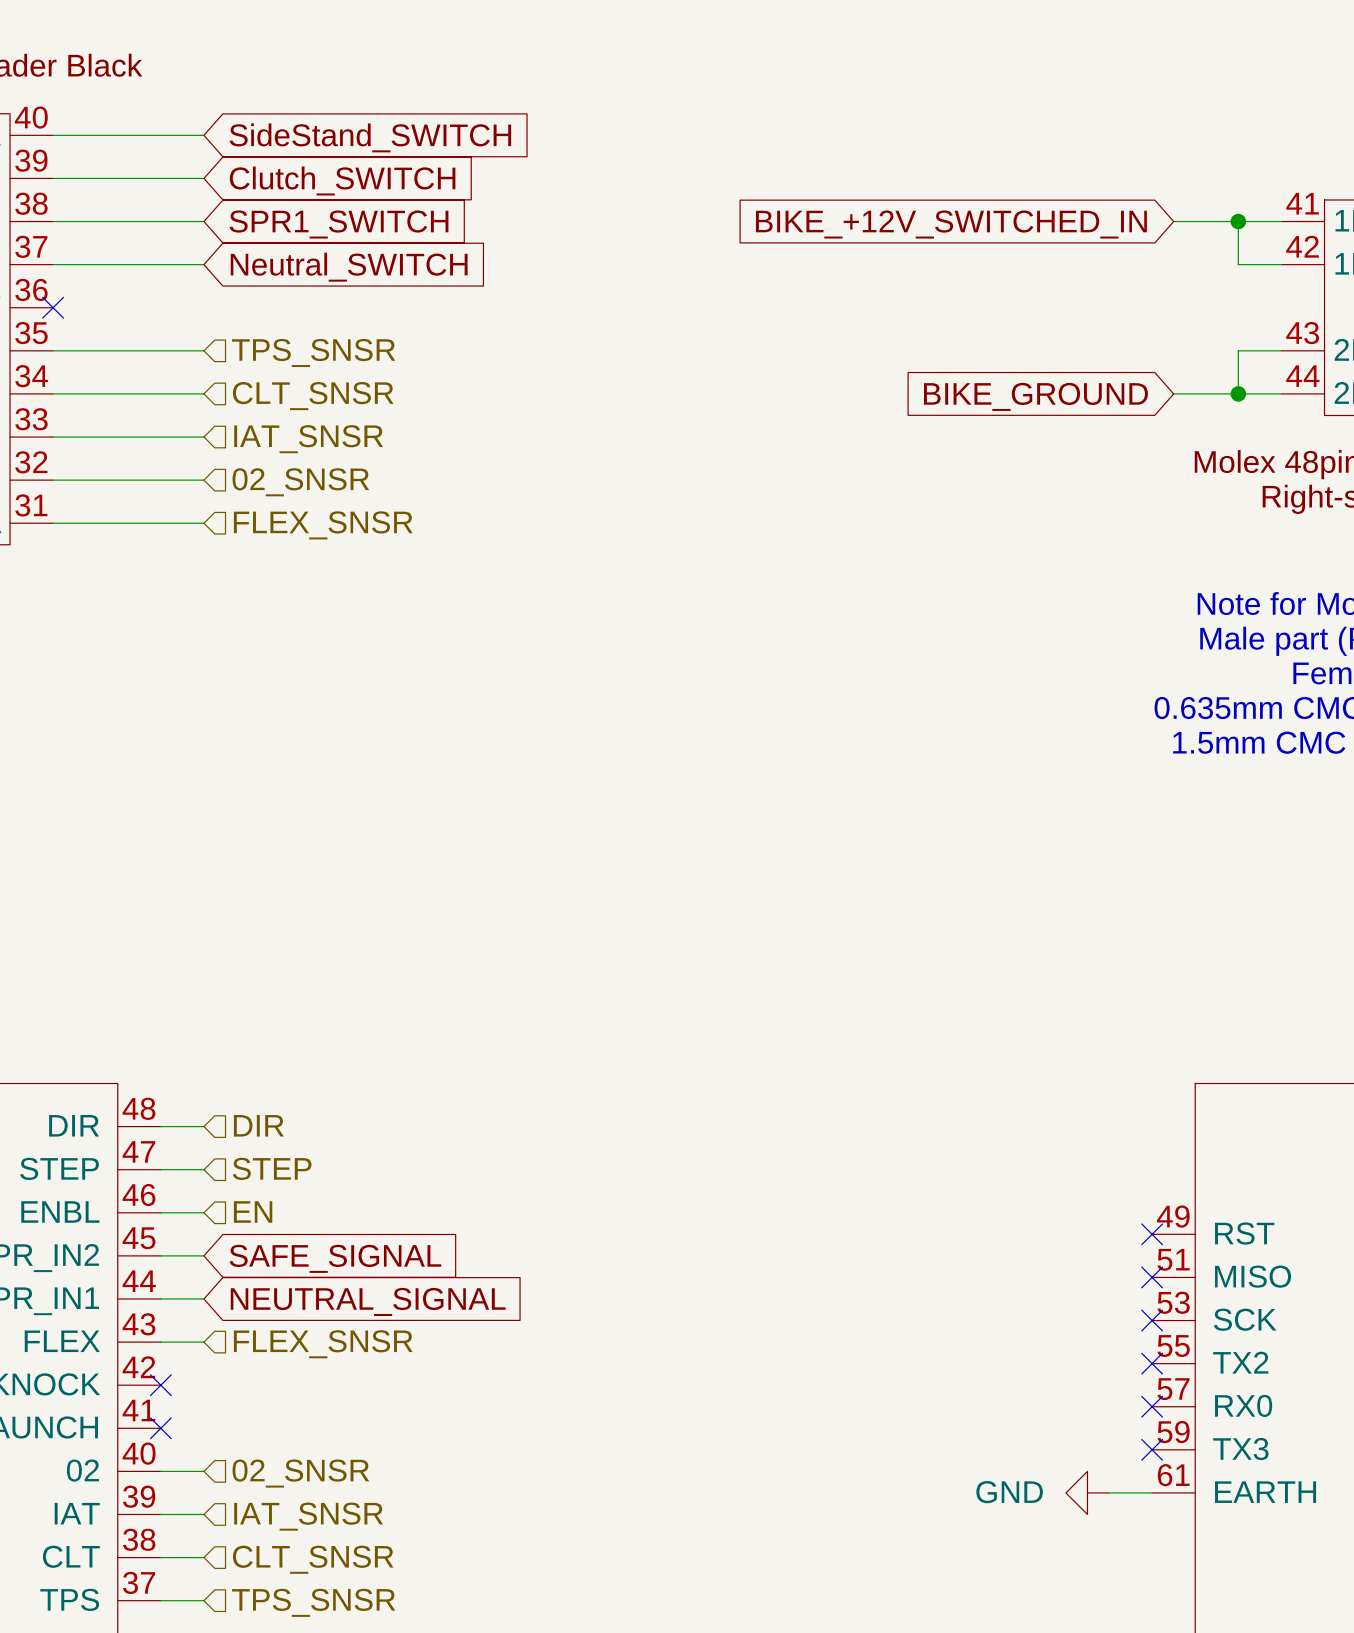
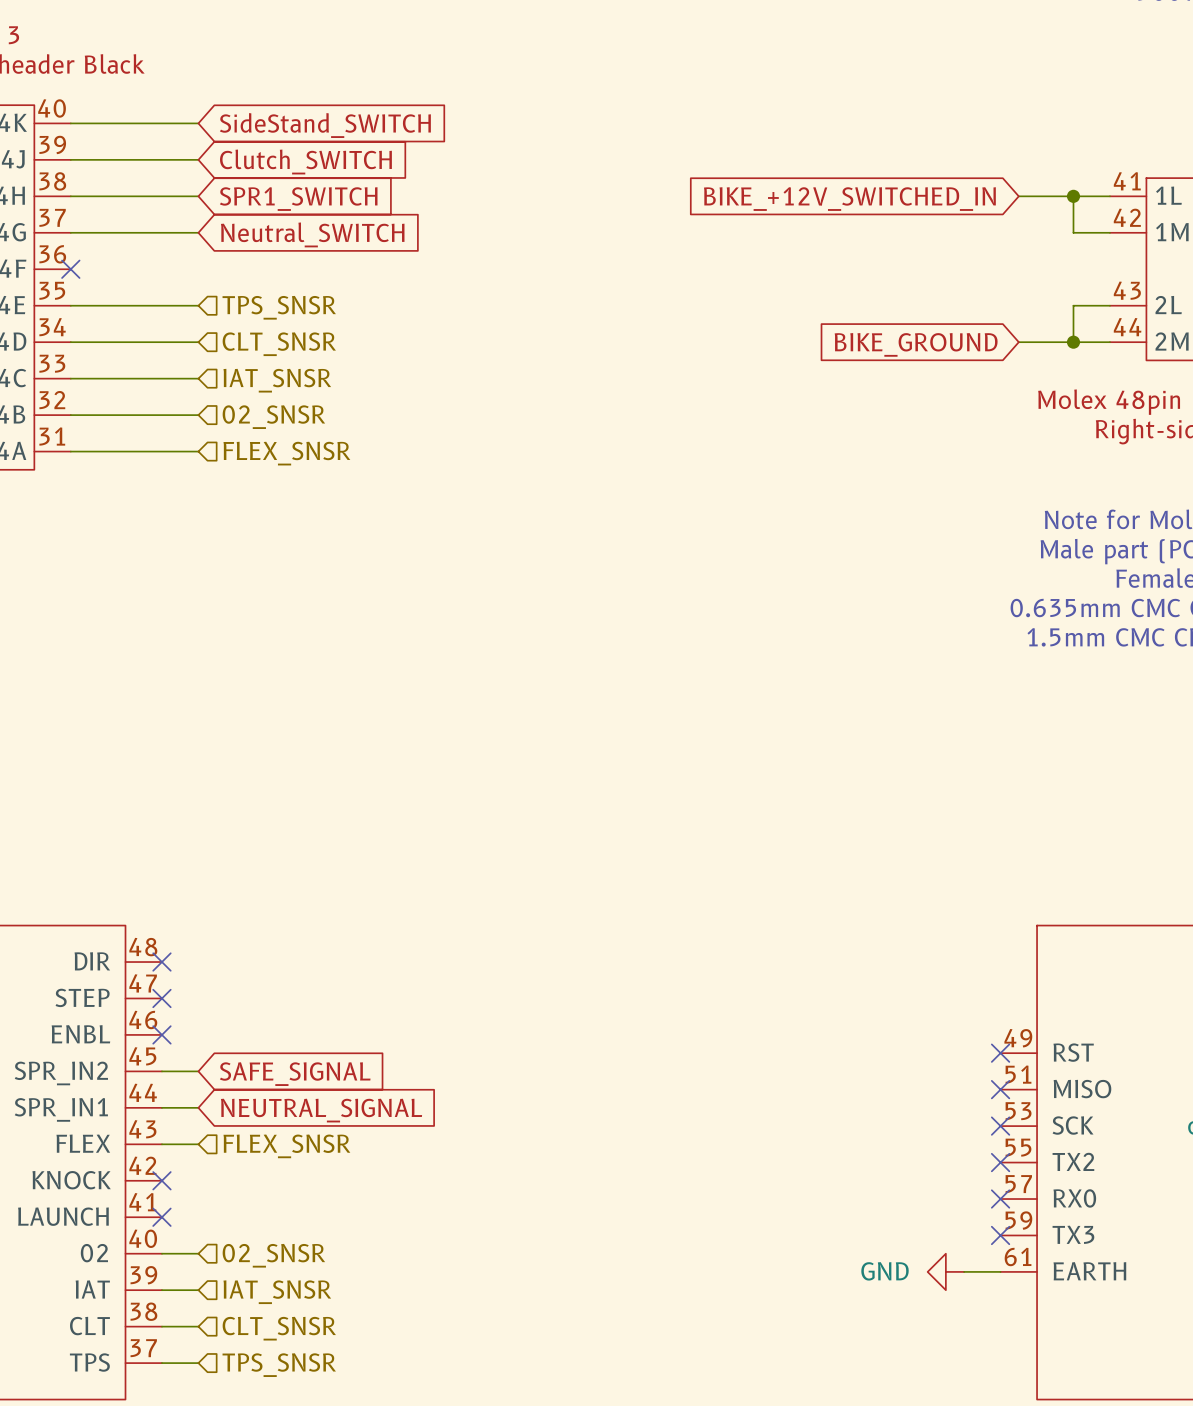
hierarchical label: DIR (258, 1125) -> none
wire: (160, 1126) (203, 1126) -> none
no-connect mark: none -> (161, 962)
hierarchical label: STEP (272, 1168) -> none
wire: (160, 1169) (203, 1169) -> none
no-connect mark: none -> (161, 998)
hierarchical label: EN (253, 1211) -> none
wire: (160, 1212) (203, 1212) -> none
no-connect mark: none -> (161, 1034)

